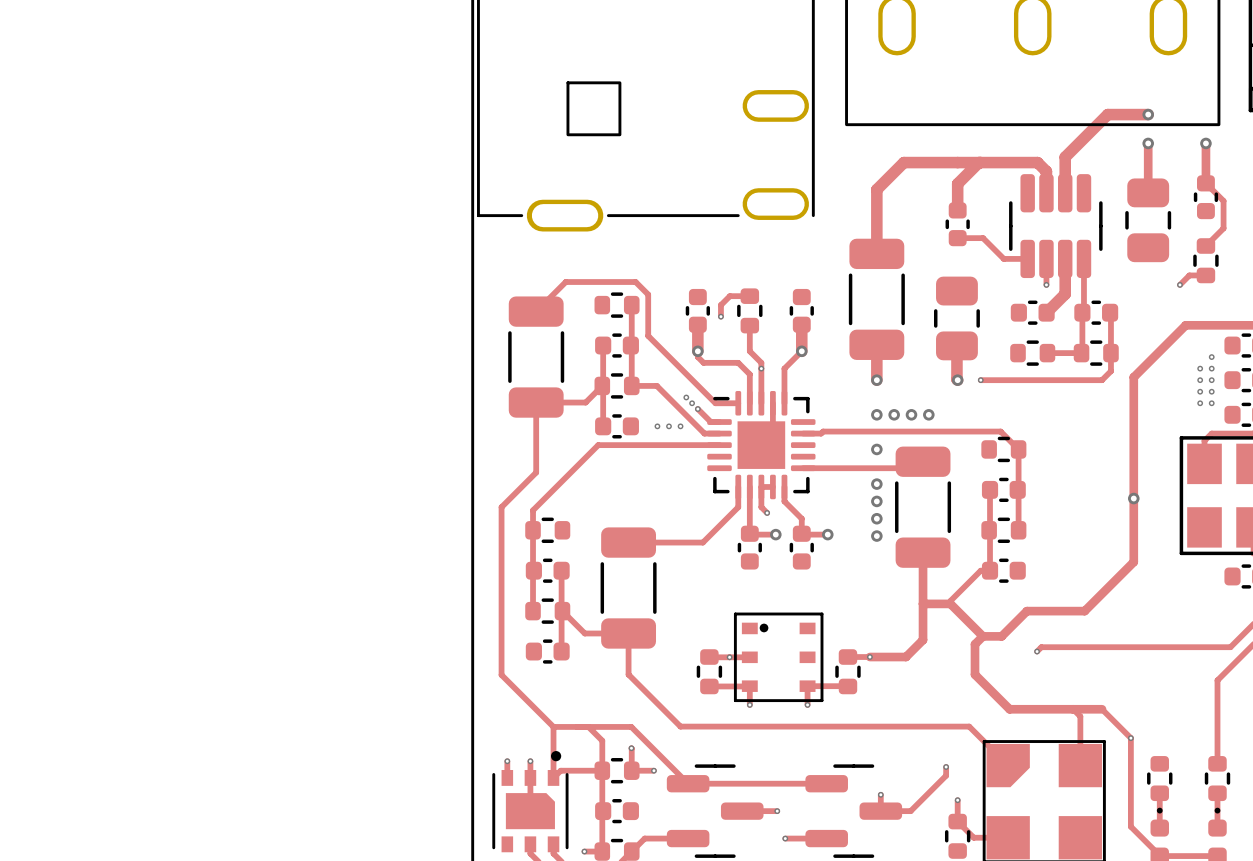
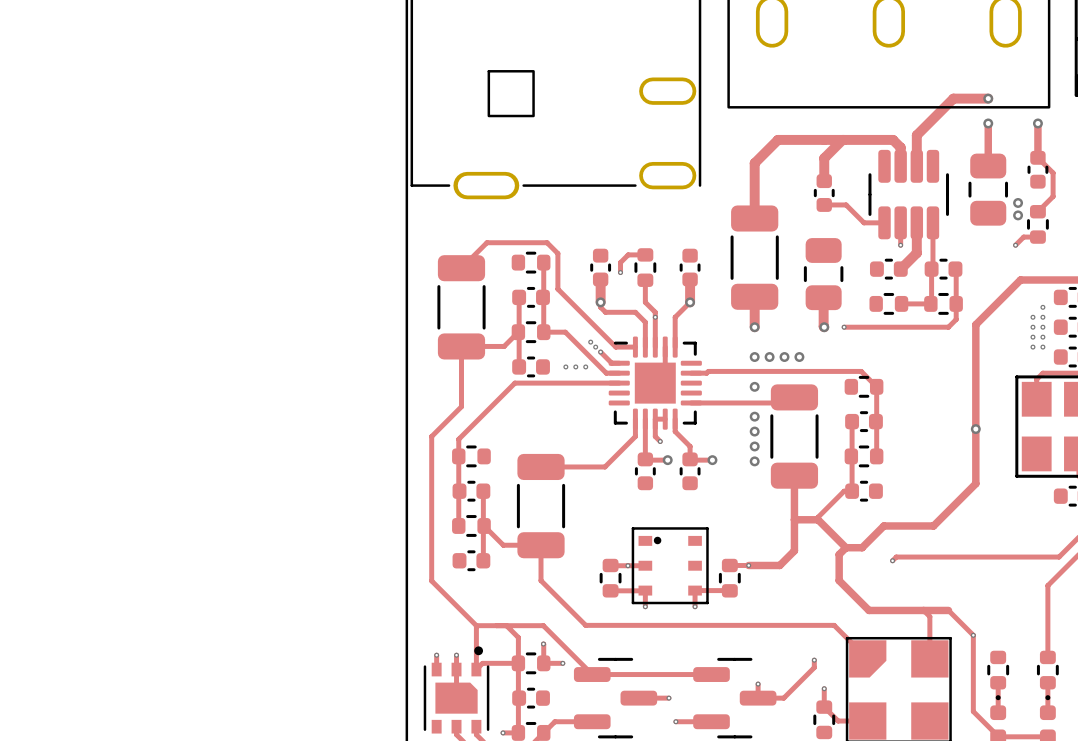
via: none -> (1018, 202)
via: none -> (1018, 215)

